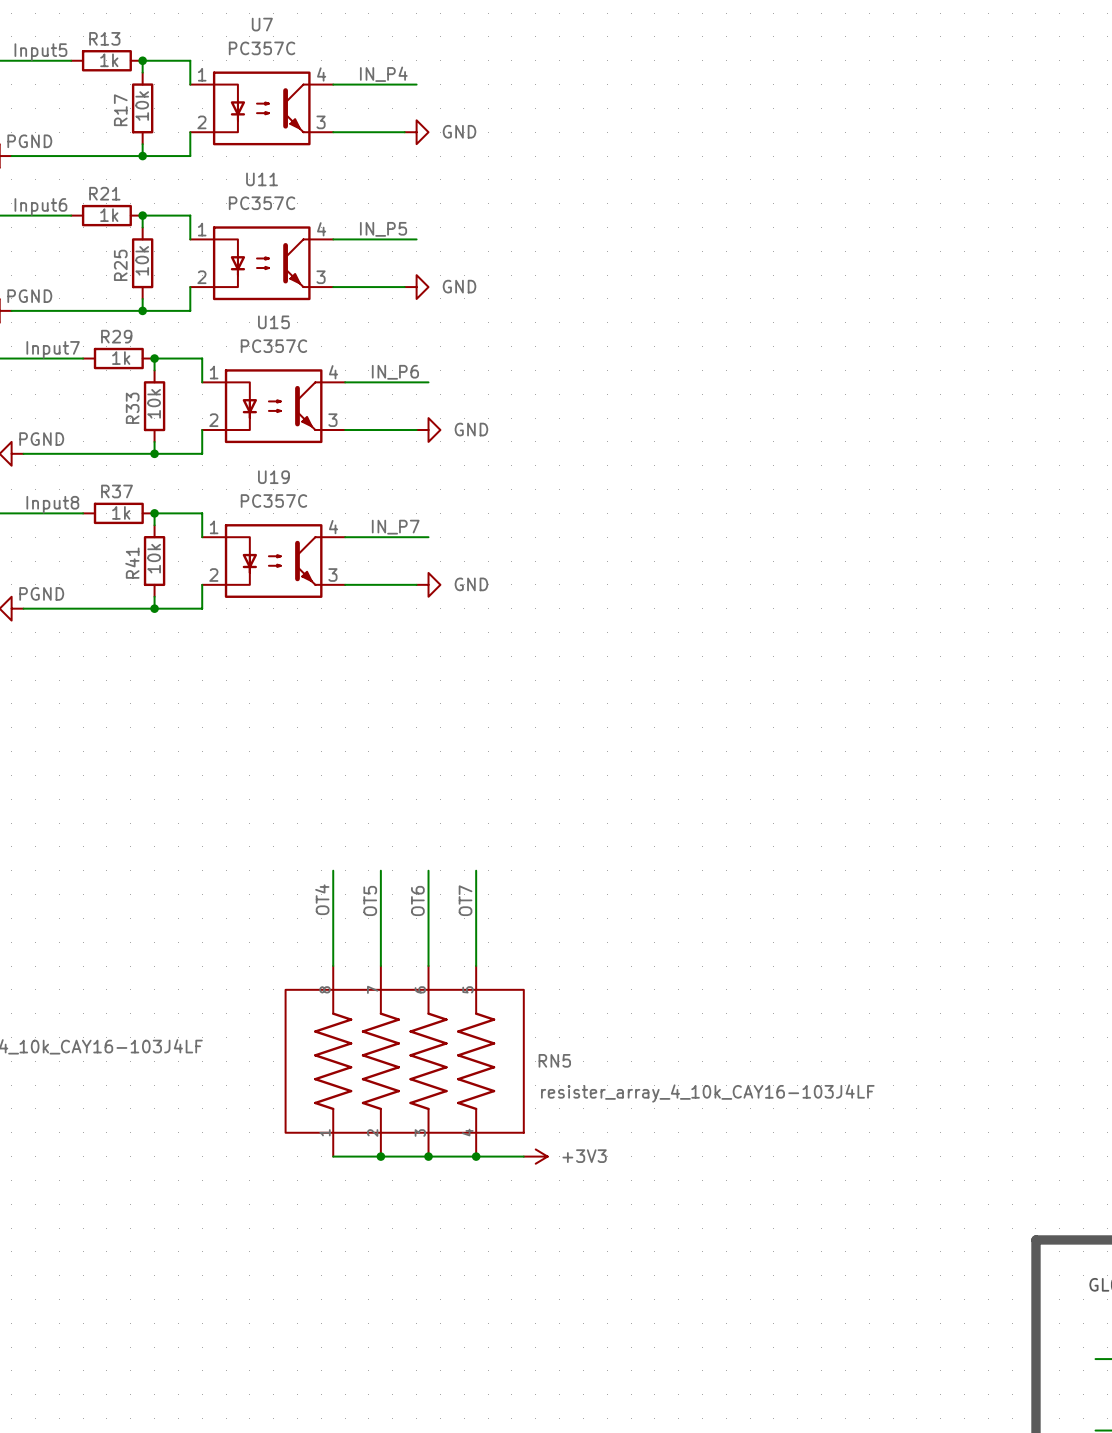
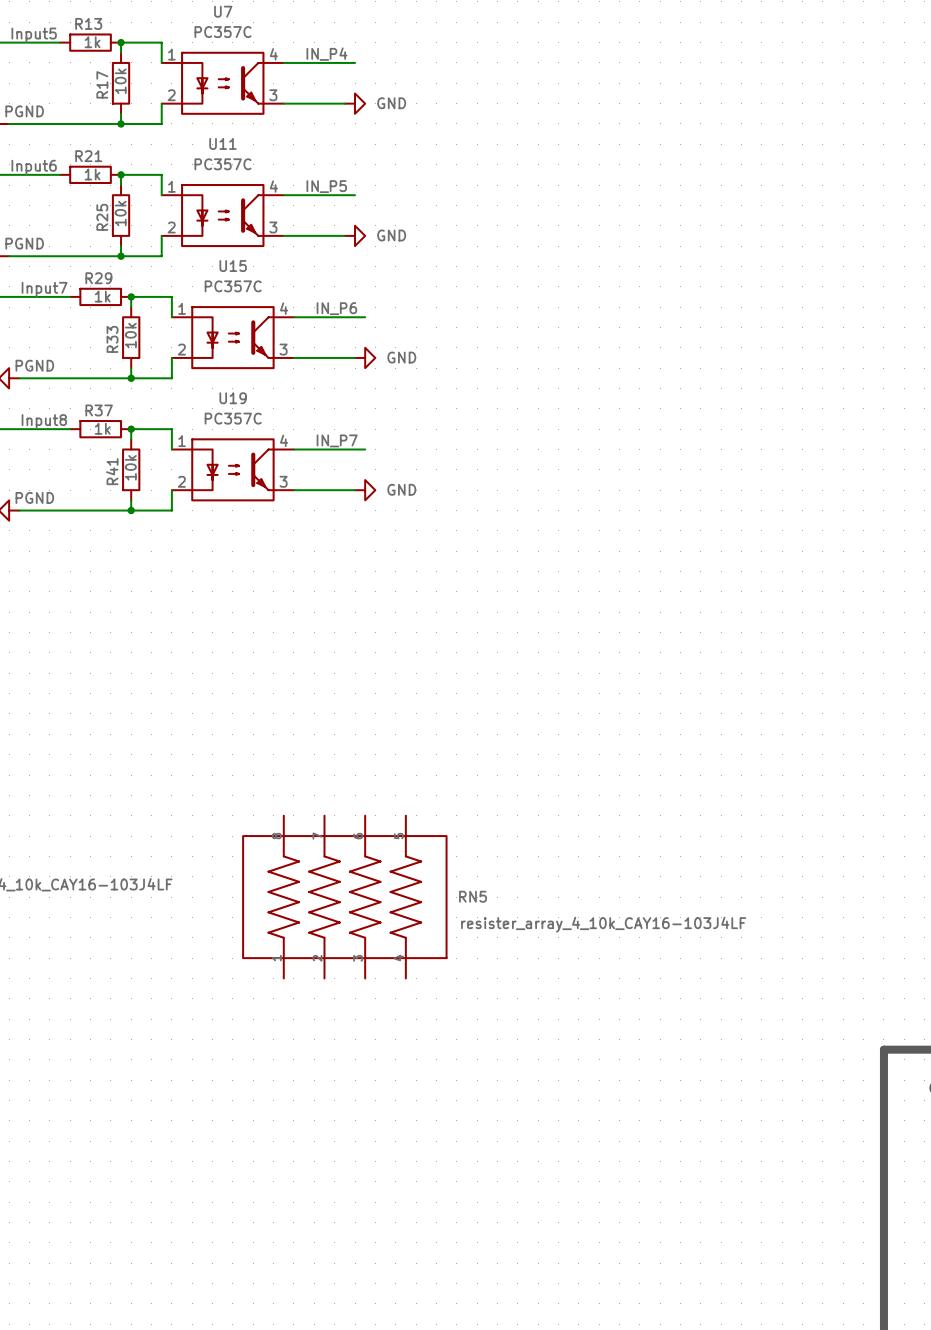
wire: (333, 870) (333, 966) -> none
wire: (380, 870) (380, 966) -> none
wire: (428, 870) (428, 966) -> none
wire: (476, 870) (476, 966) -> none
label: OT4 (322, 899) -> none
label: OT5 (370, 900) -> none
label: OT6 (417, 900) -> none
label: OT7 (465, 900) -> none
wire: (333, 1156) (523, 1156) -> none
junction: (380, 1156) -> none
junction: (428, 1156) -> none
junction: (476, 1156) -> none
power symbol: +3V3 (535, 1156) -> none

